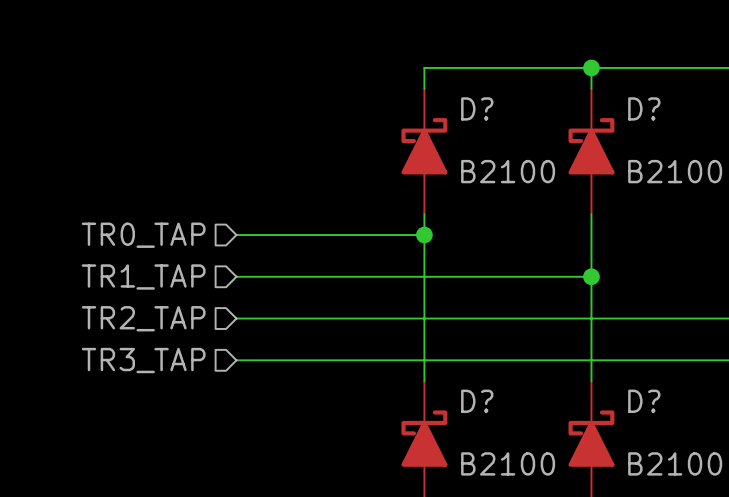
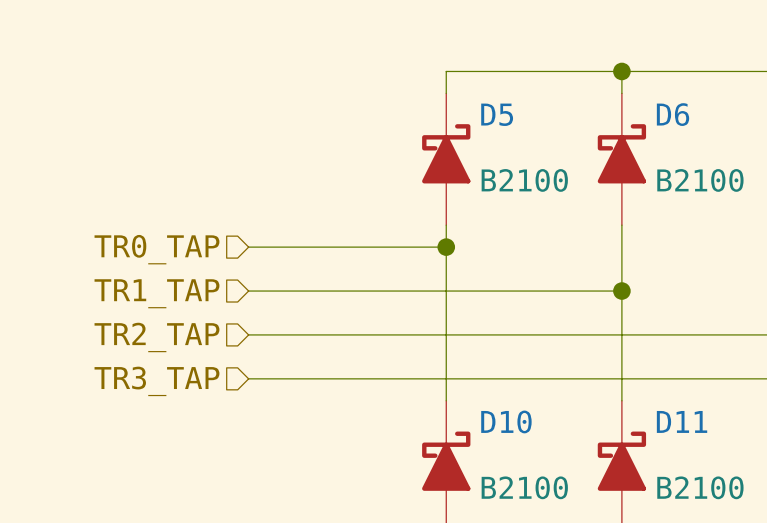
D? name: D? (477, 108) -> D5 (497, 114)
D? name: D? (644, 108) -> D6 (673, 114)
D? name: D? (477, 401) -> D10 (506, 421)
D? name: D? (644, 401) -> D11 (682, 421)

